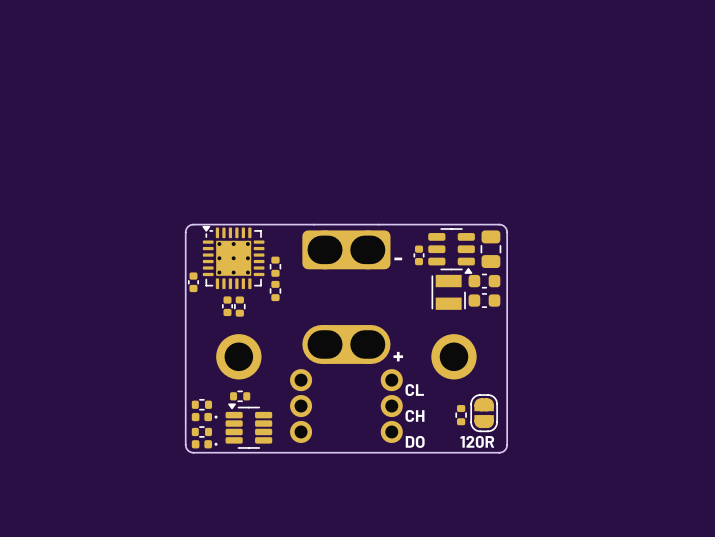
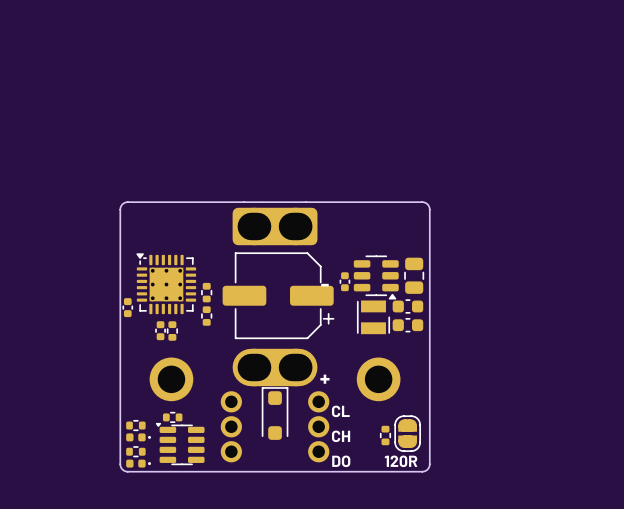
board edge: (185, 232) (187, 226) (193, 224) (499, 224) (504, 226) (507, 232) -> (120, 259) (120, 208) (123, 203) (127, 202) (423, 202) (427, 204) (429, 208) (429, 259)
part position: (346, 249) -> (275, 226)
part: none -> (278, 295)
part: none -> (275, 413)
part footprint: [225, 403, 273, 449] -> [155, 422, 205, 466]

